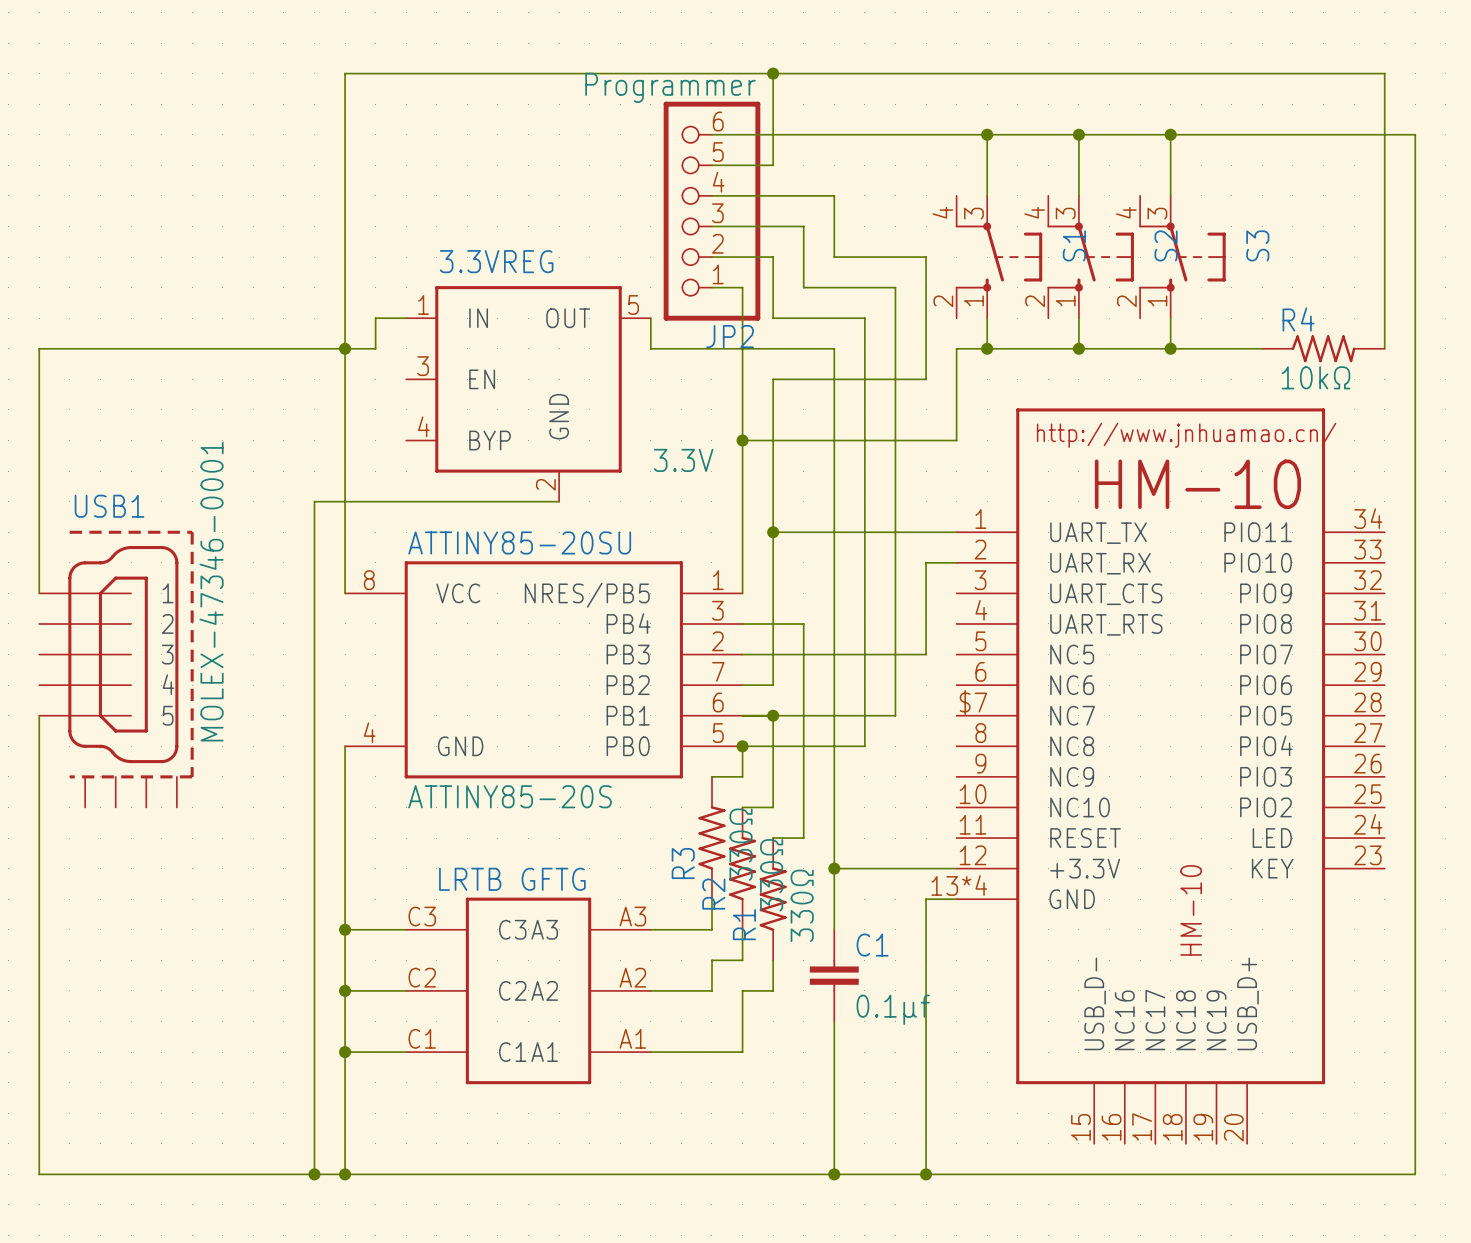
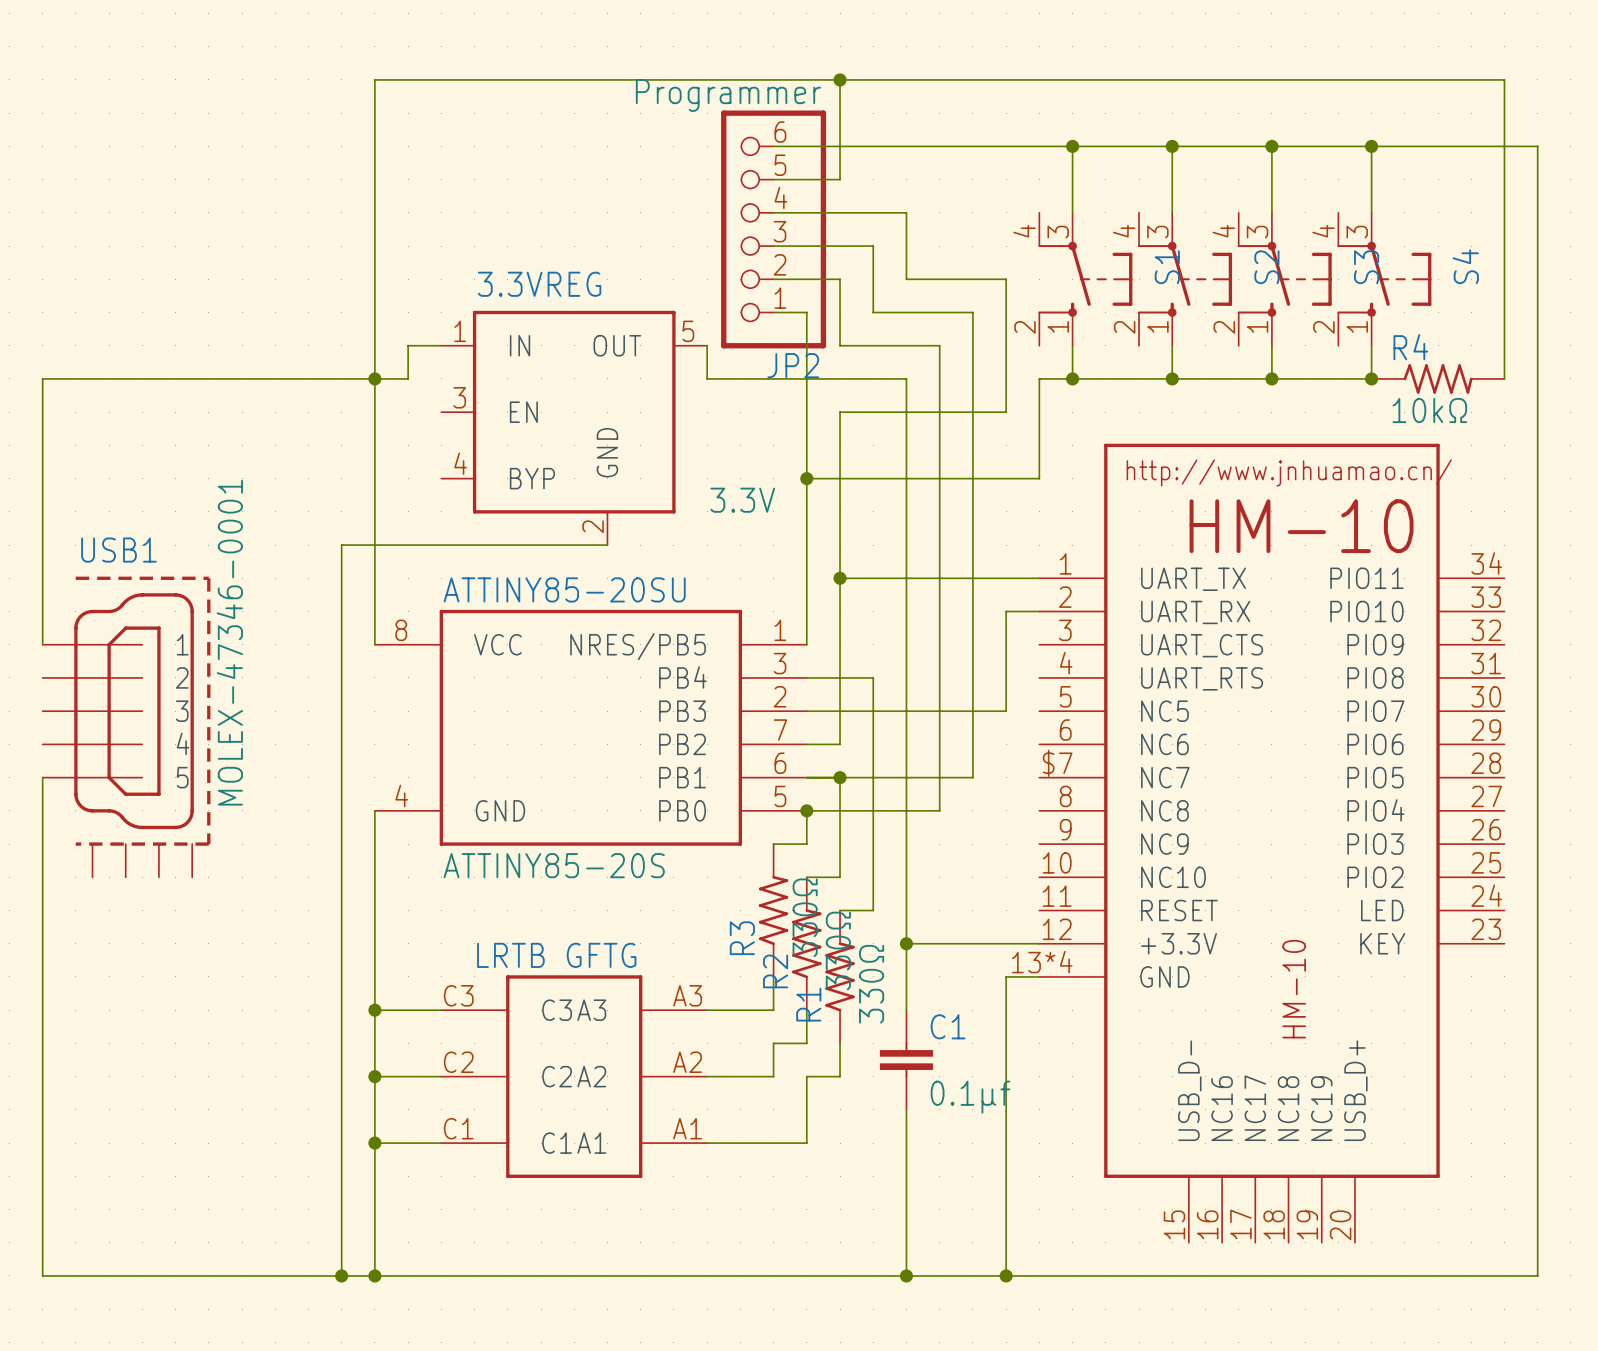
wire: none -> (1371, 146) (1371, 212)
junction: none -> (1371, 146)
S4: none -> (1384, 279)
wire: none -> (1371, 345) (1371, 378)
junction: none -> (1371, 378)

